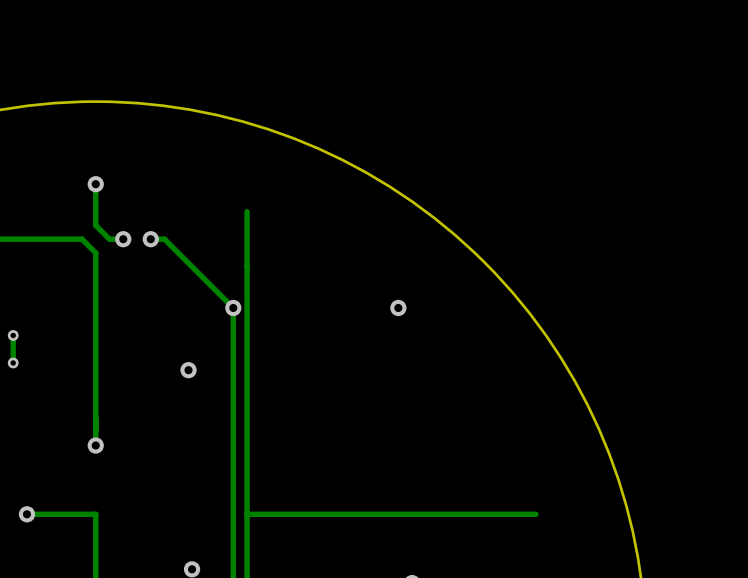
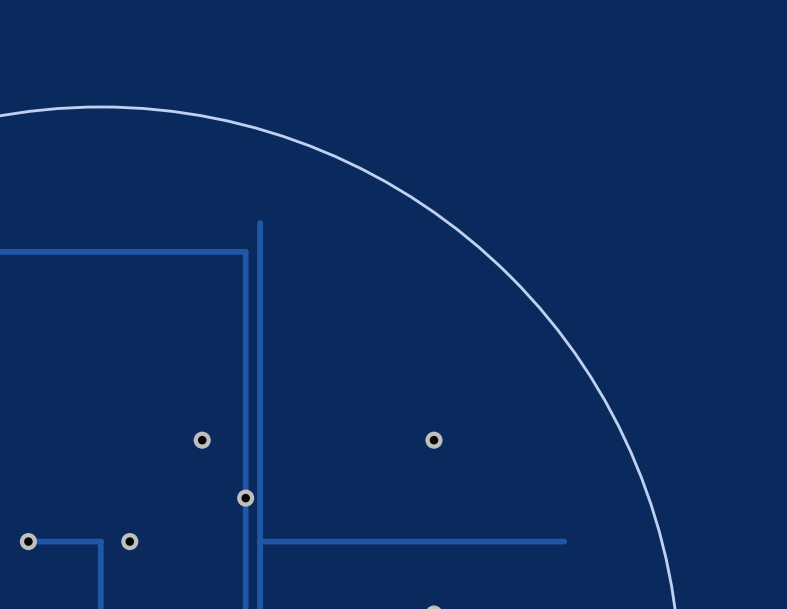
track: (95, 184) (95, 225) (109, 239) -> (86, 251) (115, 251)
via: (95, 184) -> none
track: (82, 239) (95, 252) (95, 445) -> none
via: (123, 239) -> none
track: none -> (158, 251) (129, 251)
via: (150, 239) -> none
track: (164, 239) (233, 307) -> (173, 251) (245, 251) (245, 324)
via: (233, 307) -> none
via: (398, 307) -> none
track: (13, 335) (13, 362) -> none
via: (13, 335) -> none
via: (13, 362) -> none
via position: (188, 370) -> (202, 440)
via: none -> (433, 440)
via: (95, 445) -> none
via: none -> (245, 498)
via: none -> (129, 541)
via: (192, 569) -> none

